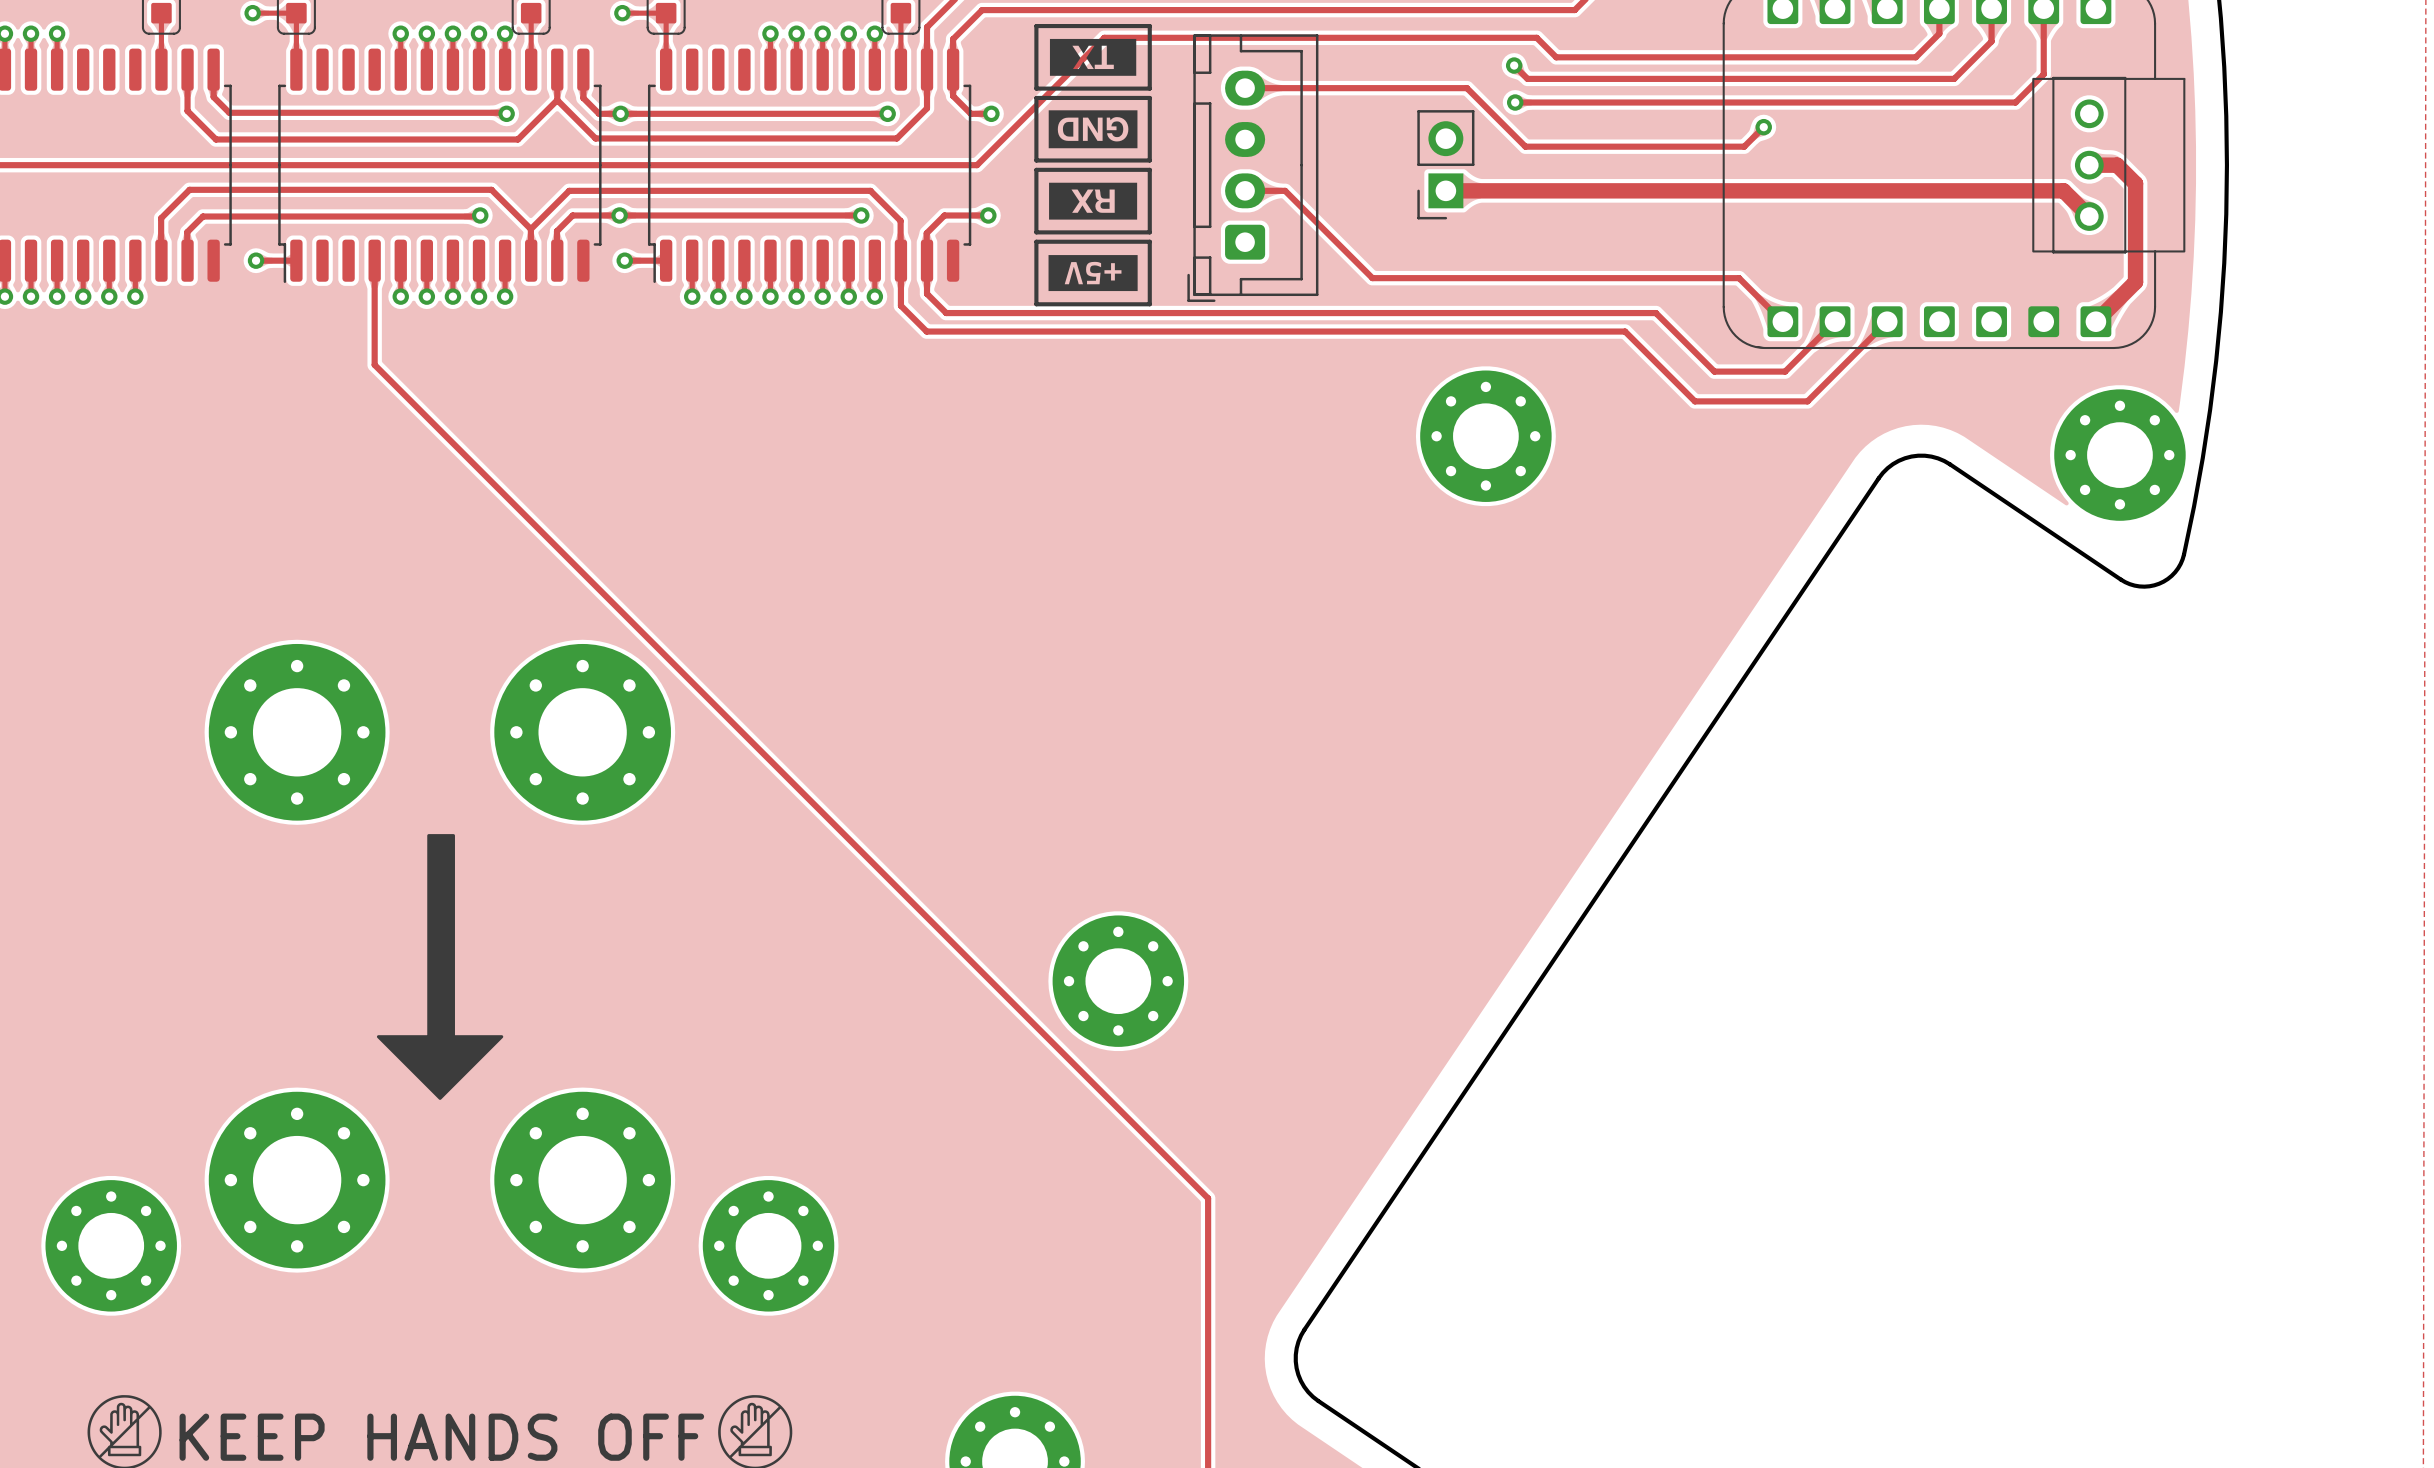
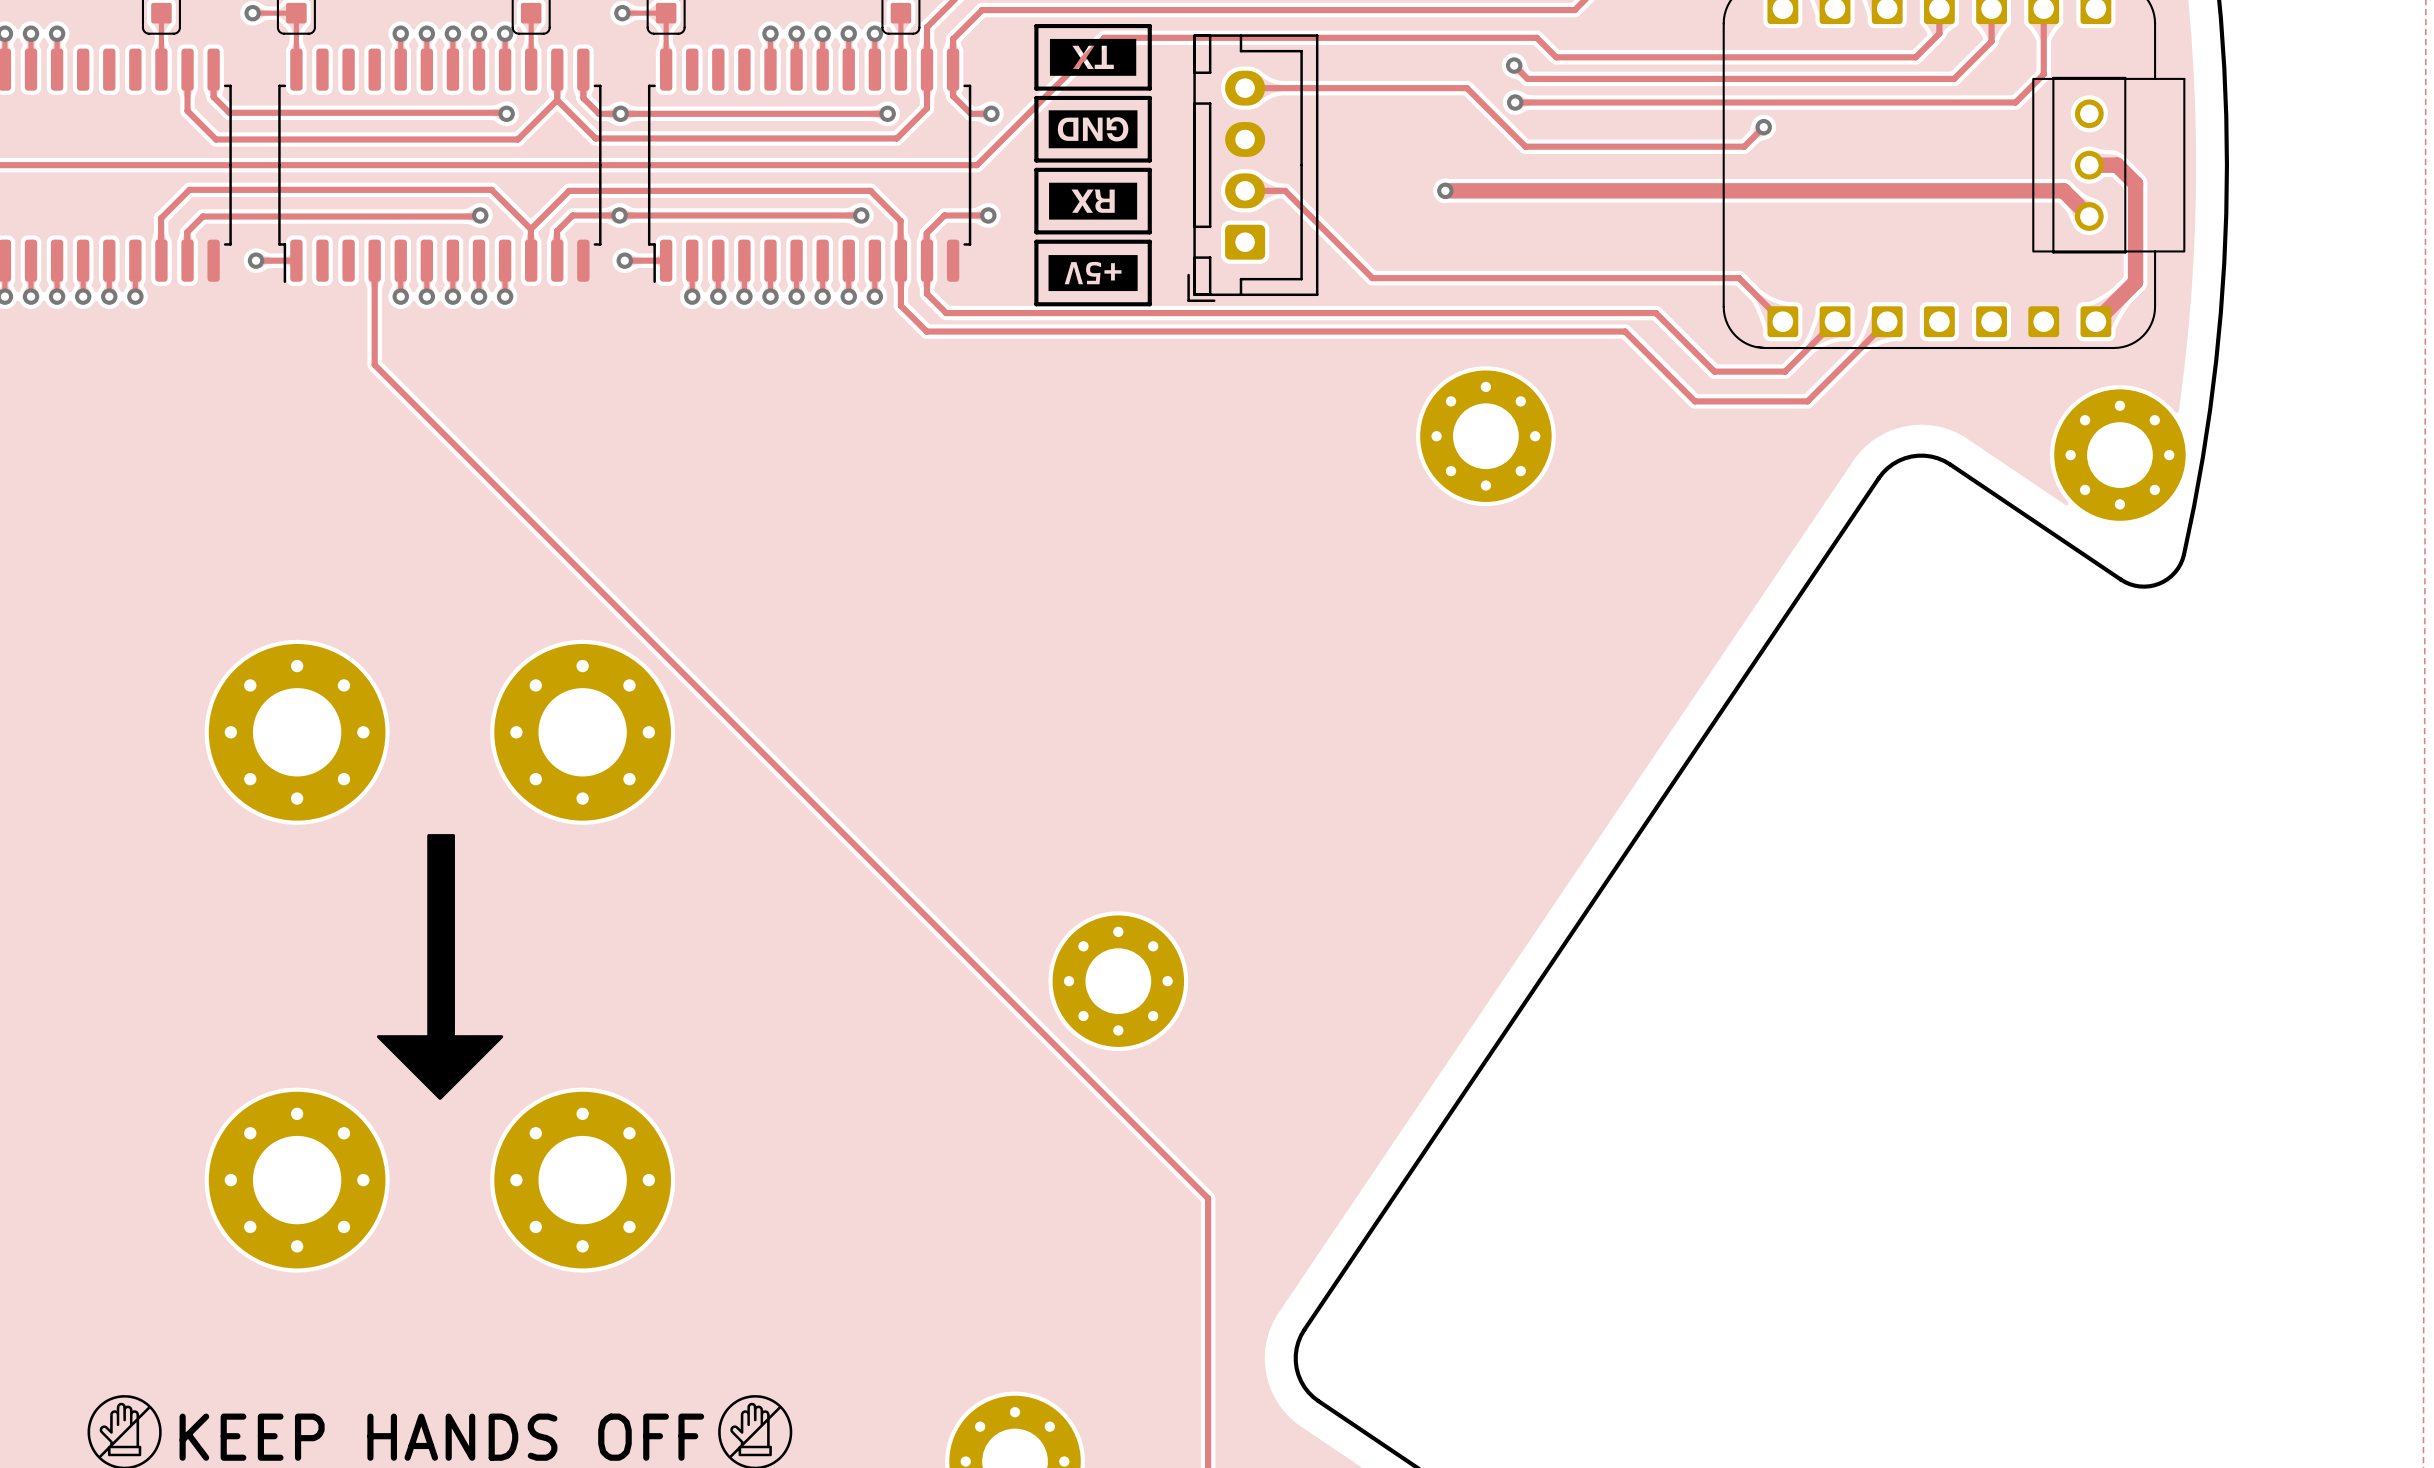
part: (1445, 164) -> none
via: none -> (1445, 190)
part: (111, 1245) -> none
part: (768, 1245) -> none

